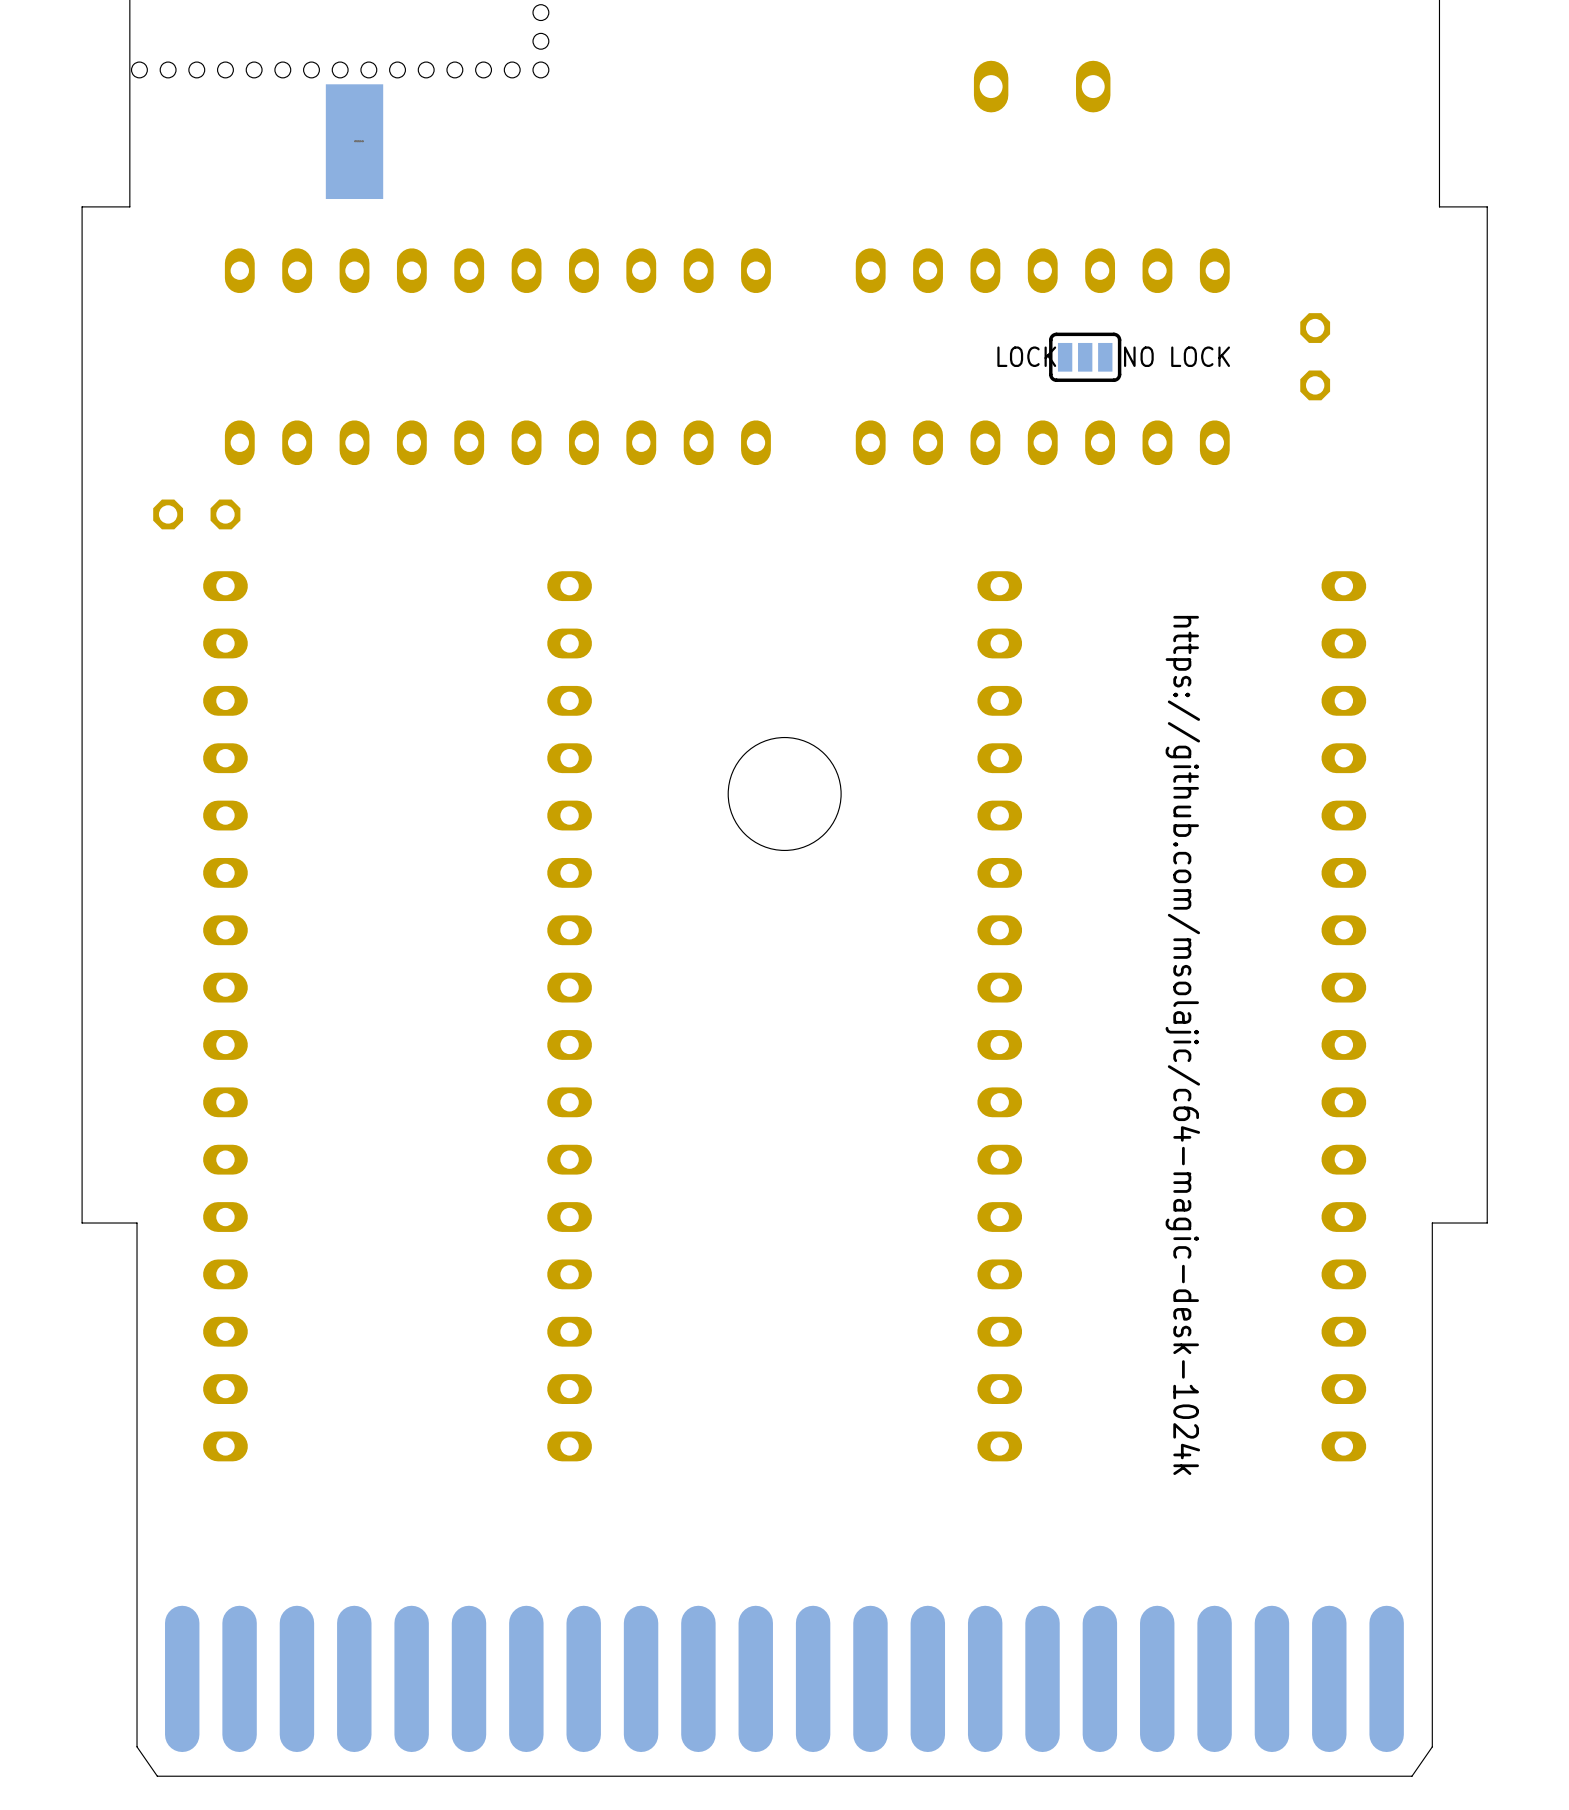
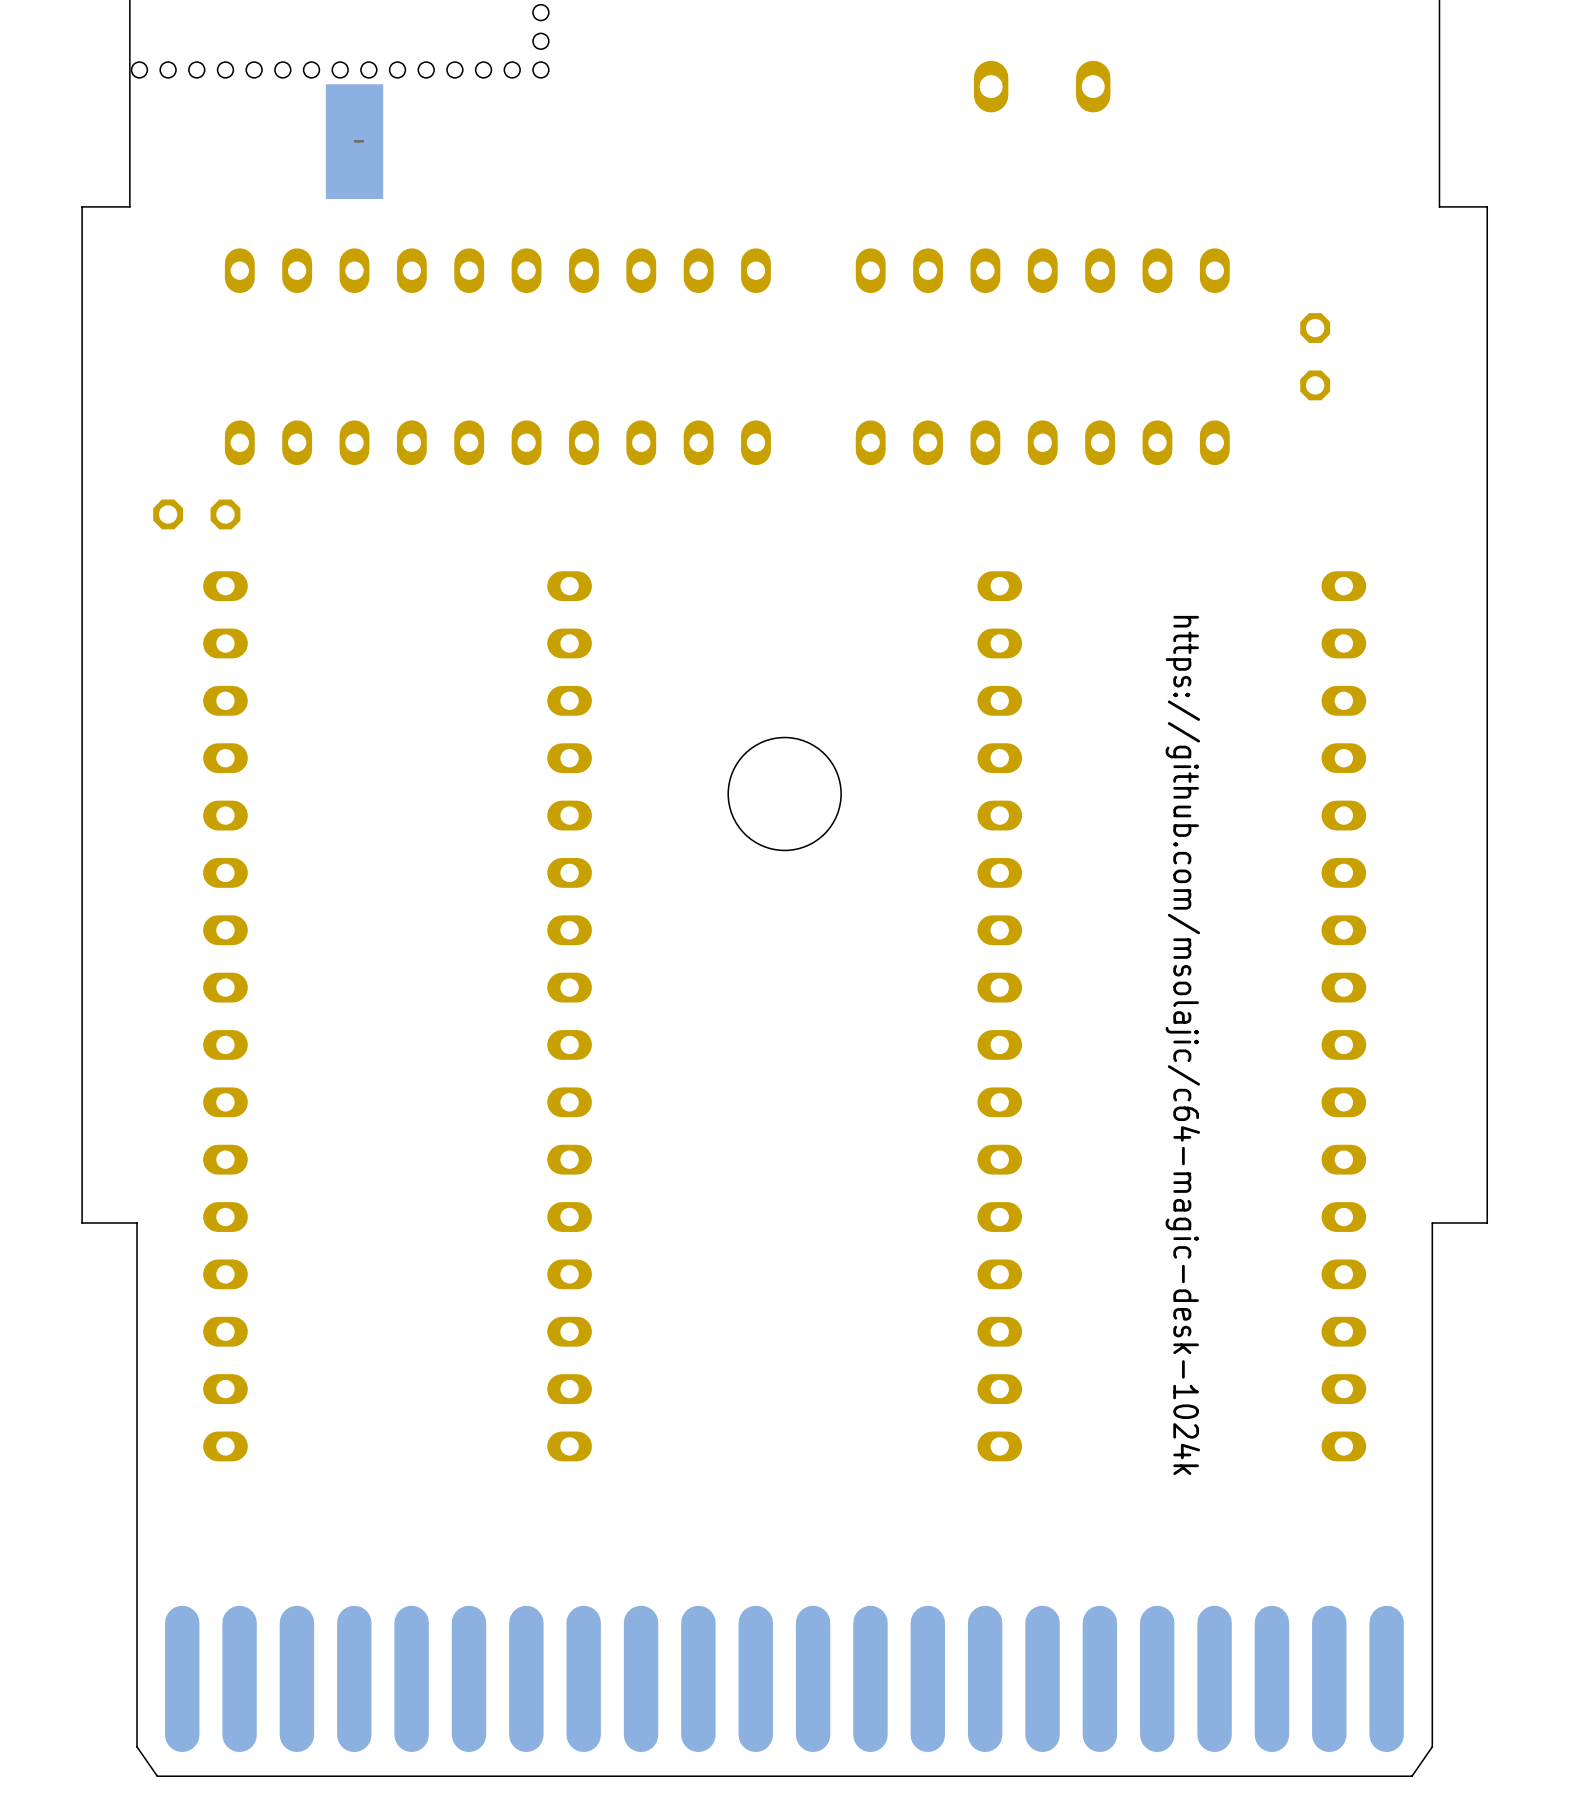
text: LOCK NO LOCK (1113, 356) -> none
part: (1085, 357) -> none

